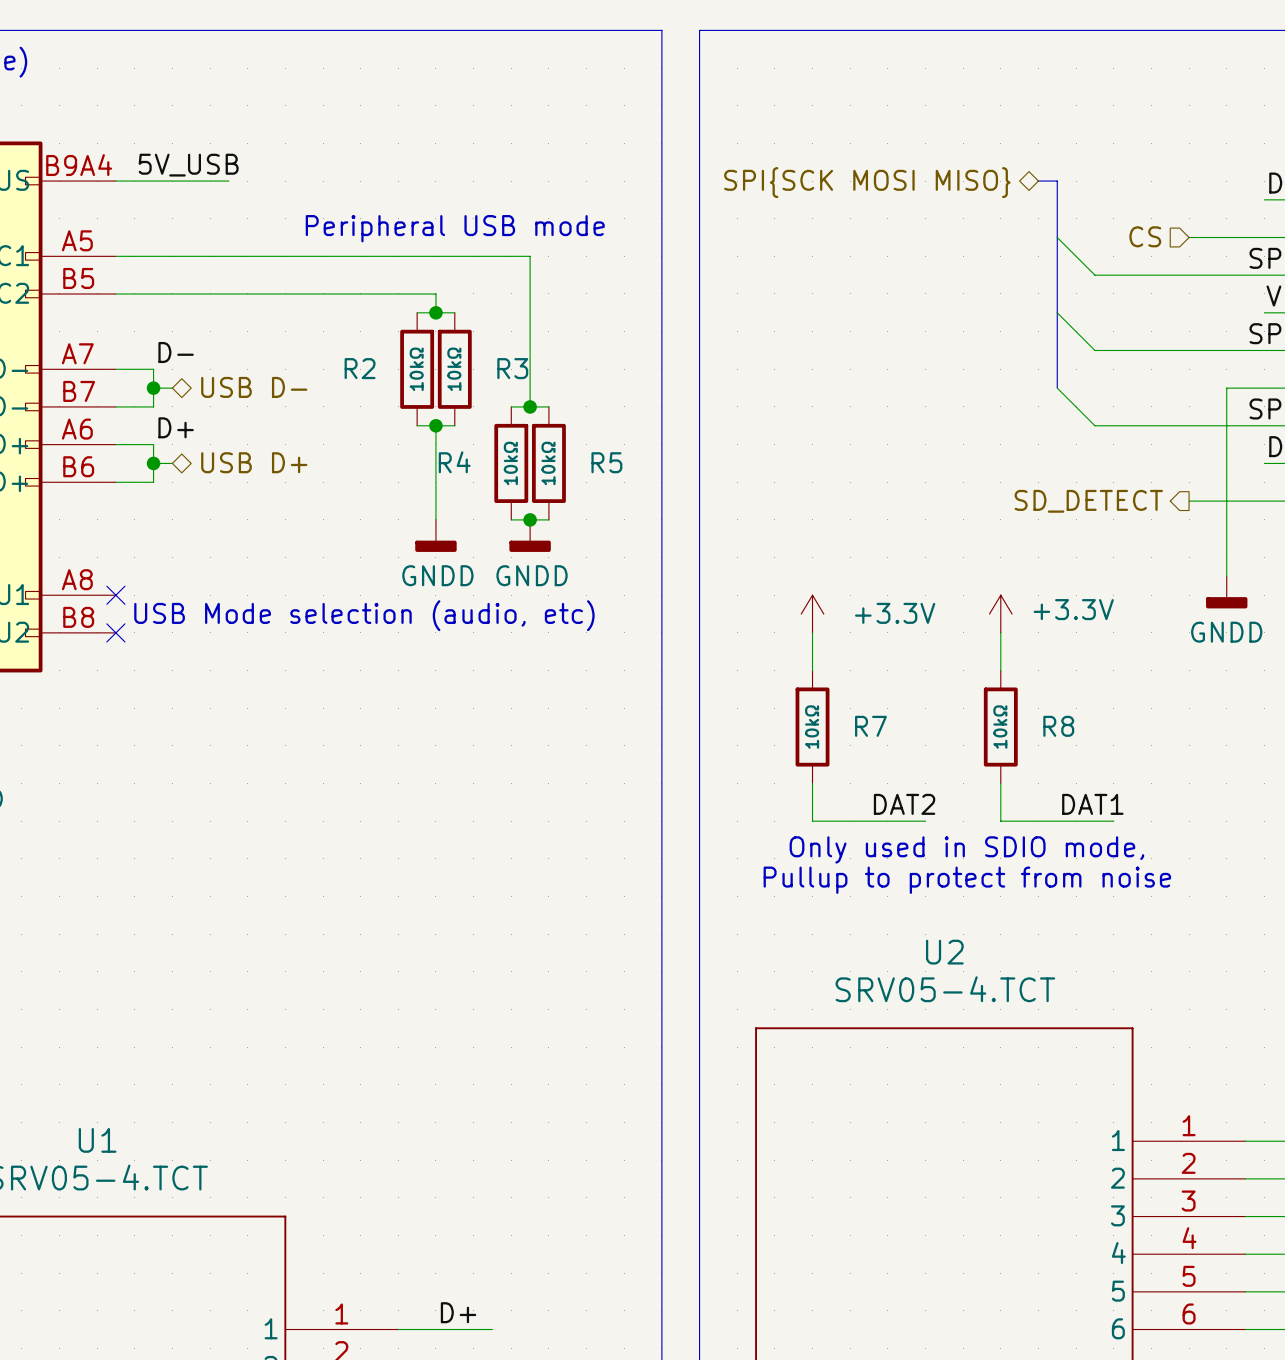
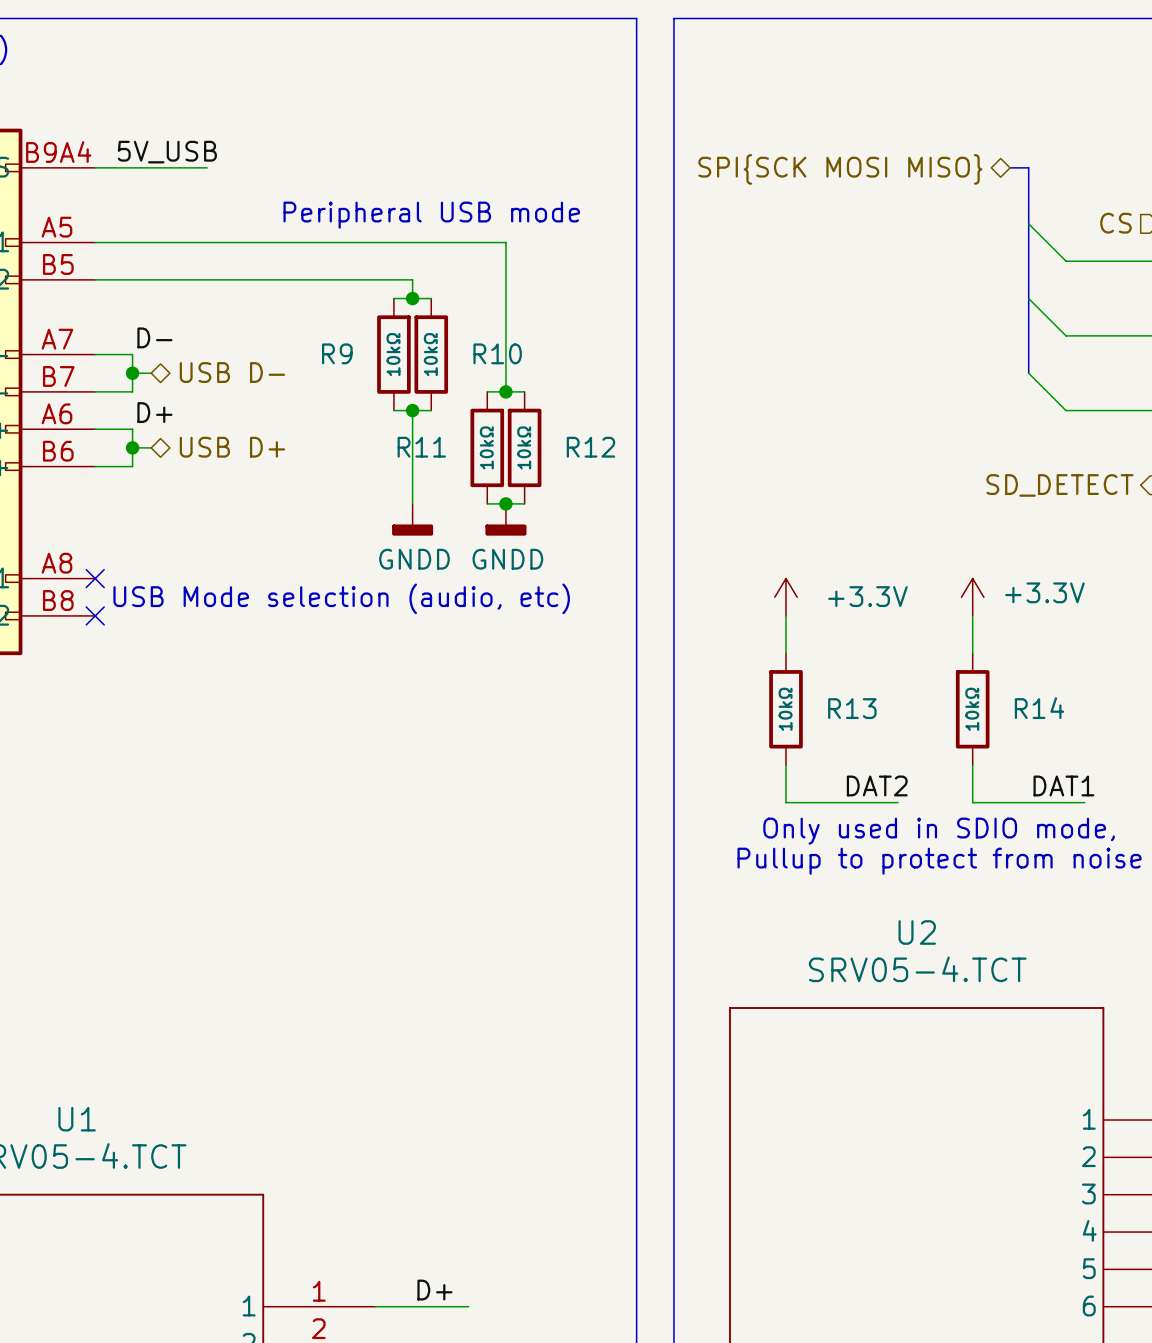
R2 name: R2 (360, 368) -> R9 (337, 353)
R3 name: R3 (512, 368) -> R10 (497, 353)
R4 name: R4 (454, 462) -> R11 (421, 447)
R5 name: R5 (606, 462) -> R12 (590, 447)
R7 name: R7 (870, 726) -> R13 (852, 708)
R8 name: R8 (1058, 726) -> R14 (1039, 708)

